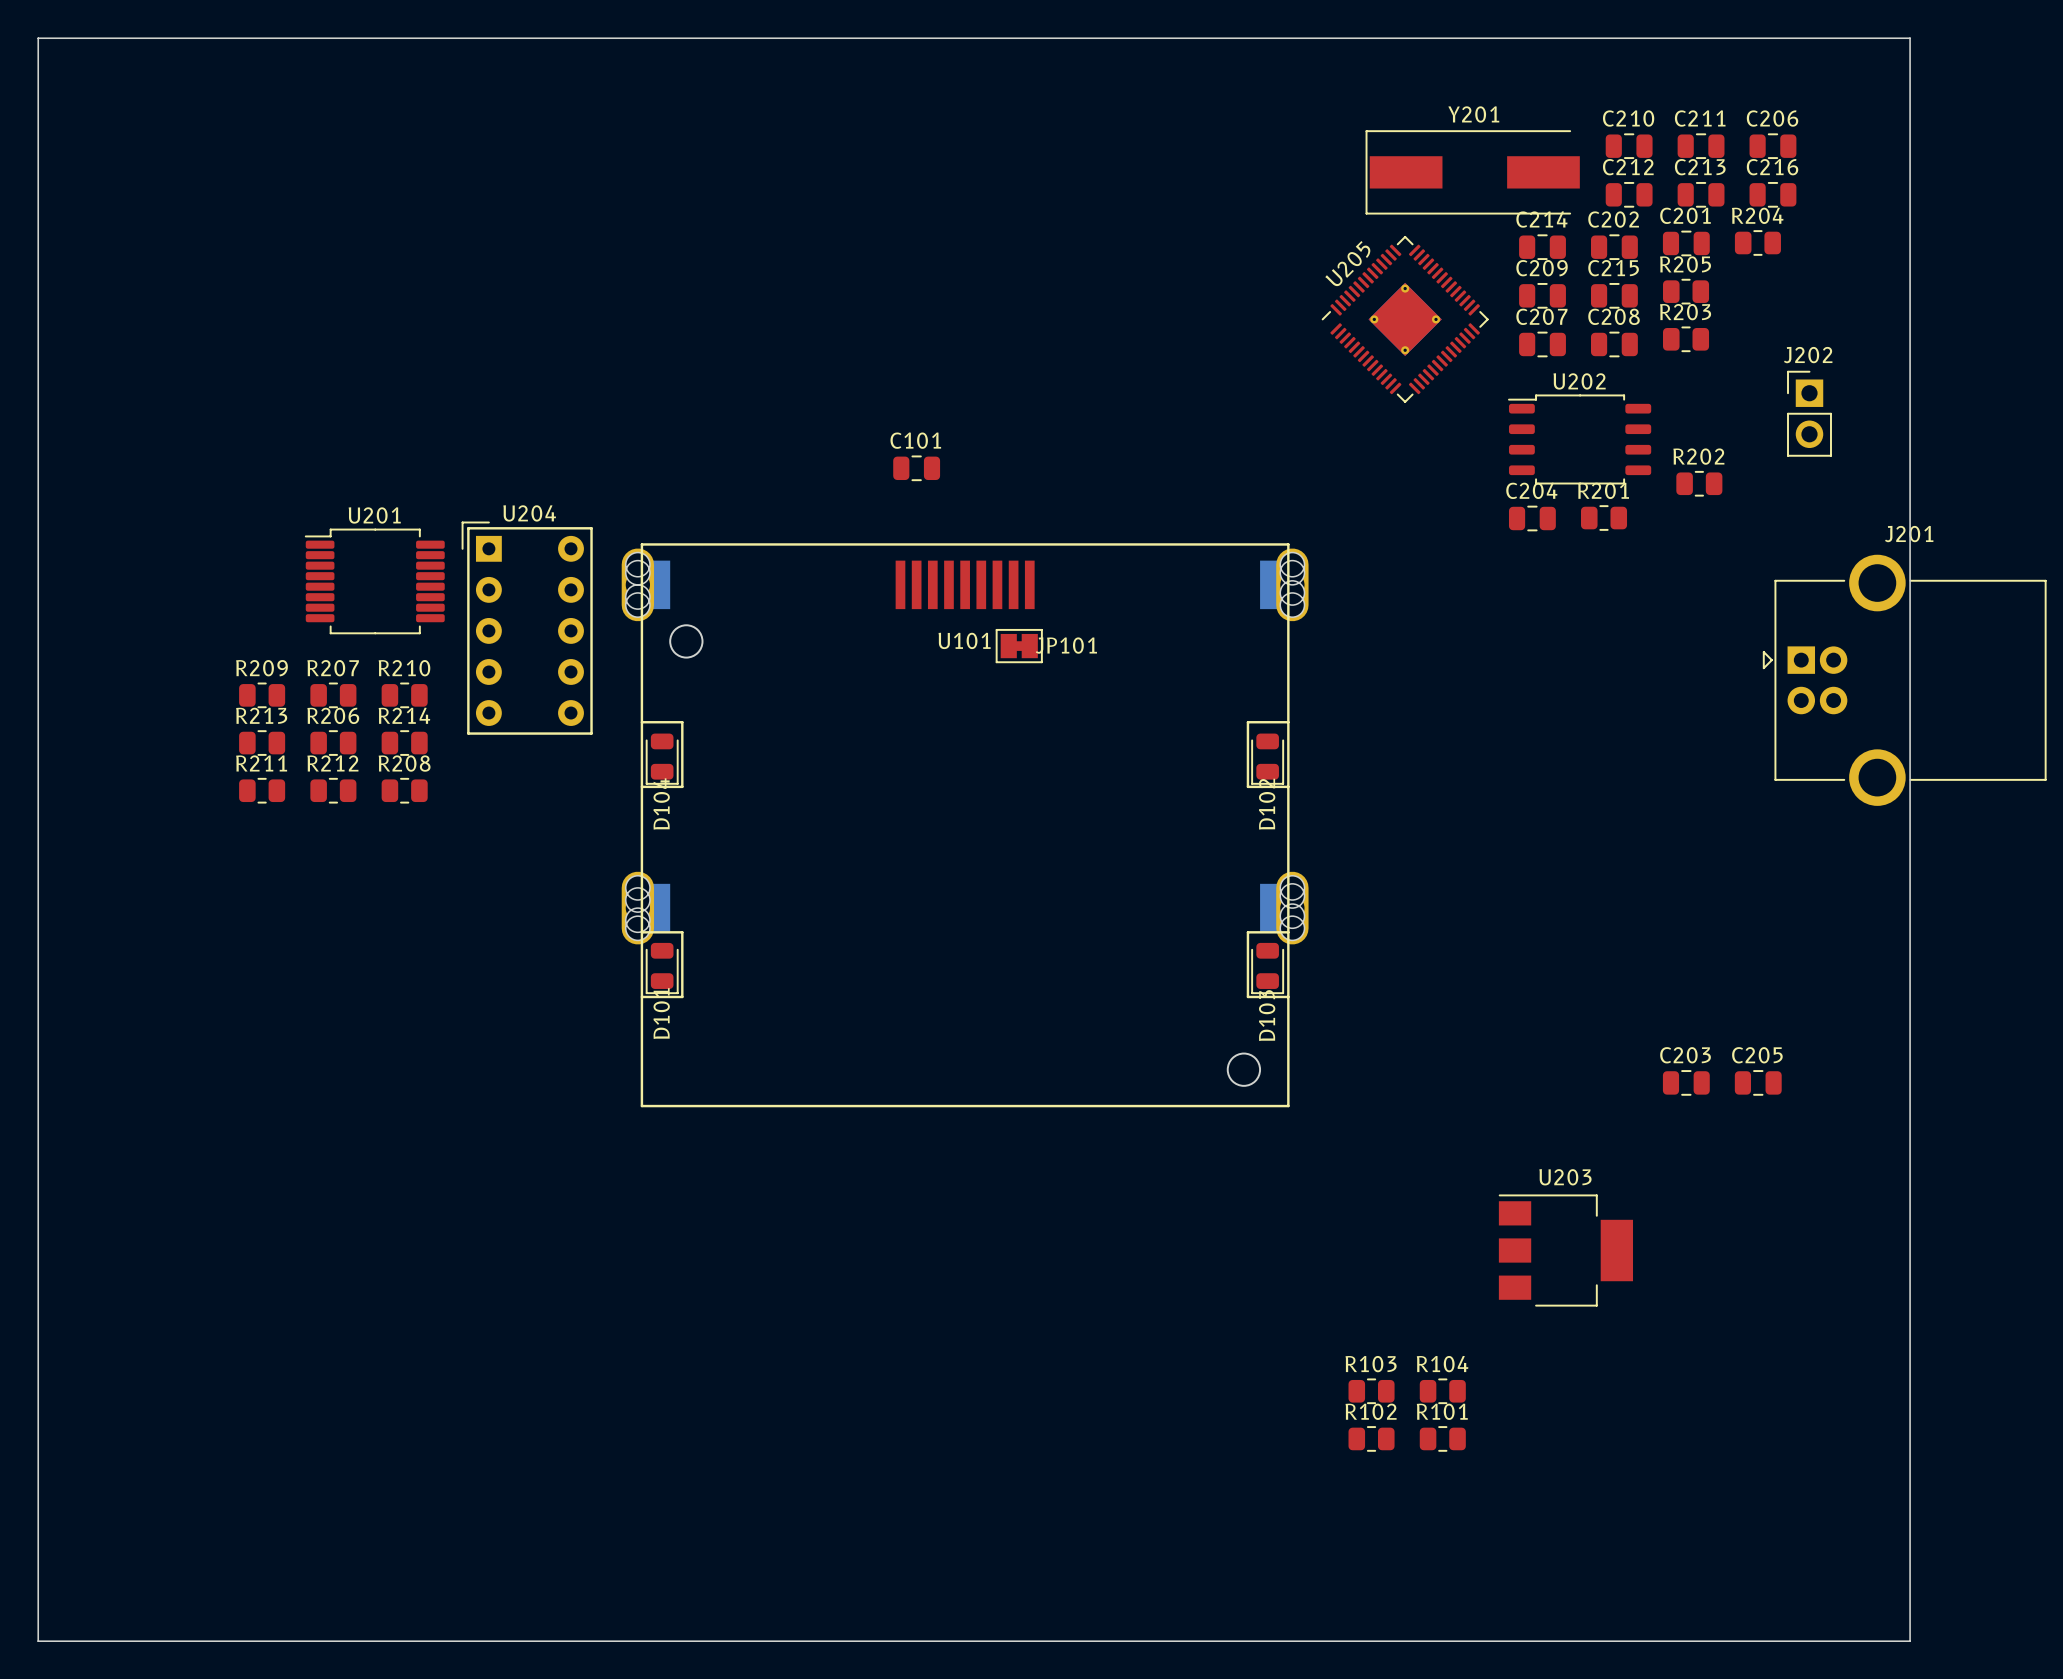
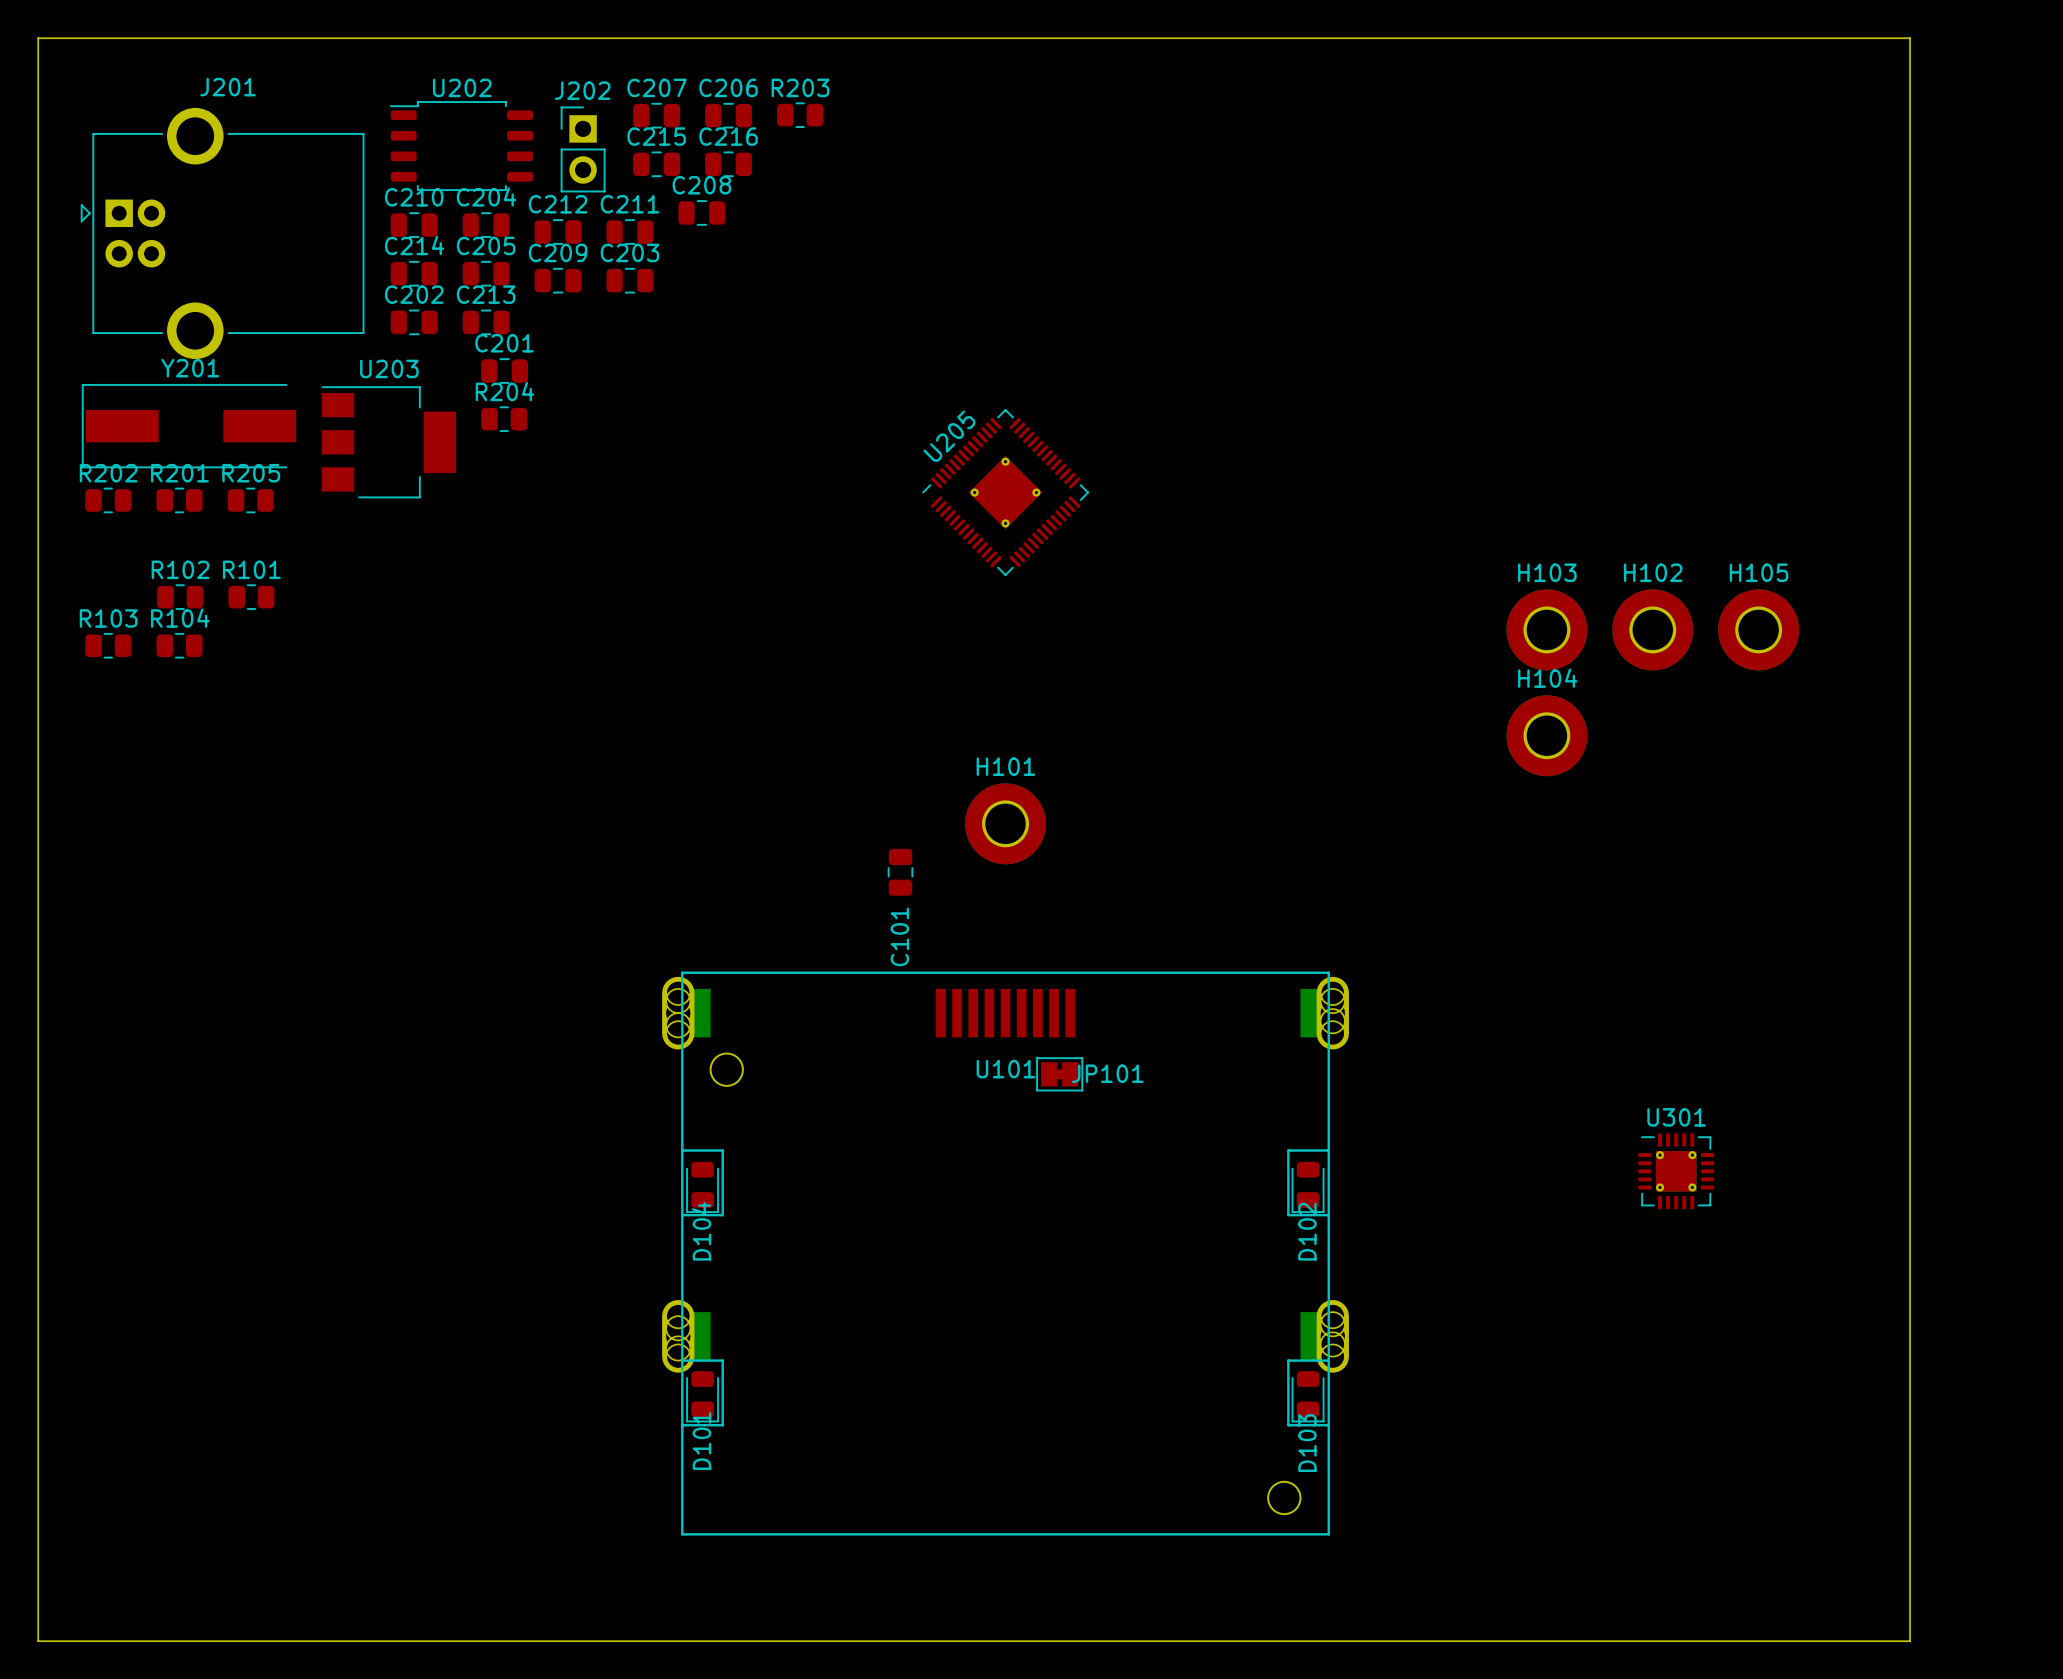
C210 position: (1629, 146) -> (414, 225)
C211 position: (1701, 146) -> (629, 232)
C206 position: (1772, 146) -> (728, 115)
Y201 position: (1472, 172) -> (188, 426)
C212 position: (1629, 194) -> (558, 232)
C213 position: (1701, 194) -> (486, 322)
C216 position: (1772, 194) -> (728, 164)
R204 position: (1757, 242) -> (504, 419)
C201 position: (1686, 243) -> (504, 371)
C214 position: (1542, 247) -> (414, 273)
C202 position: (1614, 247) -> (414, 322)
R205 position: (1686, 291) -> (250, 500)
C209 position: (1542, 295) -> (558, 280)
C215 position: (1614, 295) -> (656, 164)
U205 position: (1405, 319) -> (1005, 492)
R203 position: (1686, 339) -> (800, 115)
C207 position: (1542, 344) -> (656, 115)
C208 position: (1614, 344) -> (701, 212)
J202 position: (1809, 413) -> (583, 149)
U202 position: (1579, 439) -> (461, 146)
C101 name position: C101 (915, 440) -> C101 (899, 936)
C101 rotation: 0° (916, 468) -> 90° clockwise (900, 872)
C101 position: (916, 468) -> (900, 872)
R202 position: (1699, 483) -> (108, 500)
C204 position: (1532, 518) -> (486, 225)
R201 position: (1604, 518) -> (179, 500)
U201: (374, 581) -> none
U204: (527, 628) -> none
H103: none -> (1546, 629)
H102: none -> (1652, 629)
H105: none -> (1758, 629)
JP101 position: (1019, 646) -> (1059, 1074)
J201 position: (1904, 680) -> (222, 233)
R209: (262, 695) -> none
R207: (333, 695) -> none
R210: (404, 695) -> none
H104: none -> (1546, 735)
R213: (262, 743) -> none
R206: (333, 743) -> none
R214: (404, 743) -> none
D104 position: (662, 759) -> (702, 1187)
D102 position: (1267, 759) -> (1308, 1187)
R211: (262, 790) -> none
R212: (333, 790) -> none
R208: (404, 790) -> none
H101: none -> (1005, 823)
U101 position: (965, 825) -> (1005, 1253)
D101 position: (662, 968) -> (702, 1396)
D103 position: (1267, 968) -> (1308, 1396)
C203 position: (1686, 1082) -> (629, 280)
C205 position: (1758, 1082) -> (486, 273)
U301: none -> (1676, 1171)
U203 position: (1565, 1250) -> (388, 442)
R103 position: (1371, 1391) -> (108, 645)
R104 position: (1442, 1391) -> (179, 645)
R102 position: (1371, 1438) -> (180, 597)
R101 position: (1442, 1438) -> (251, 597)

